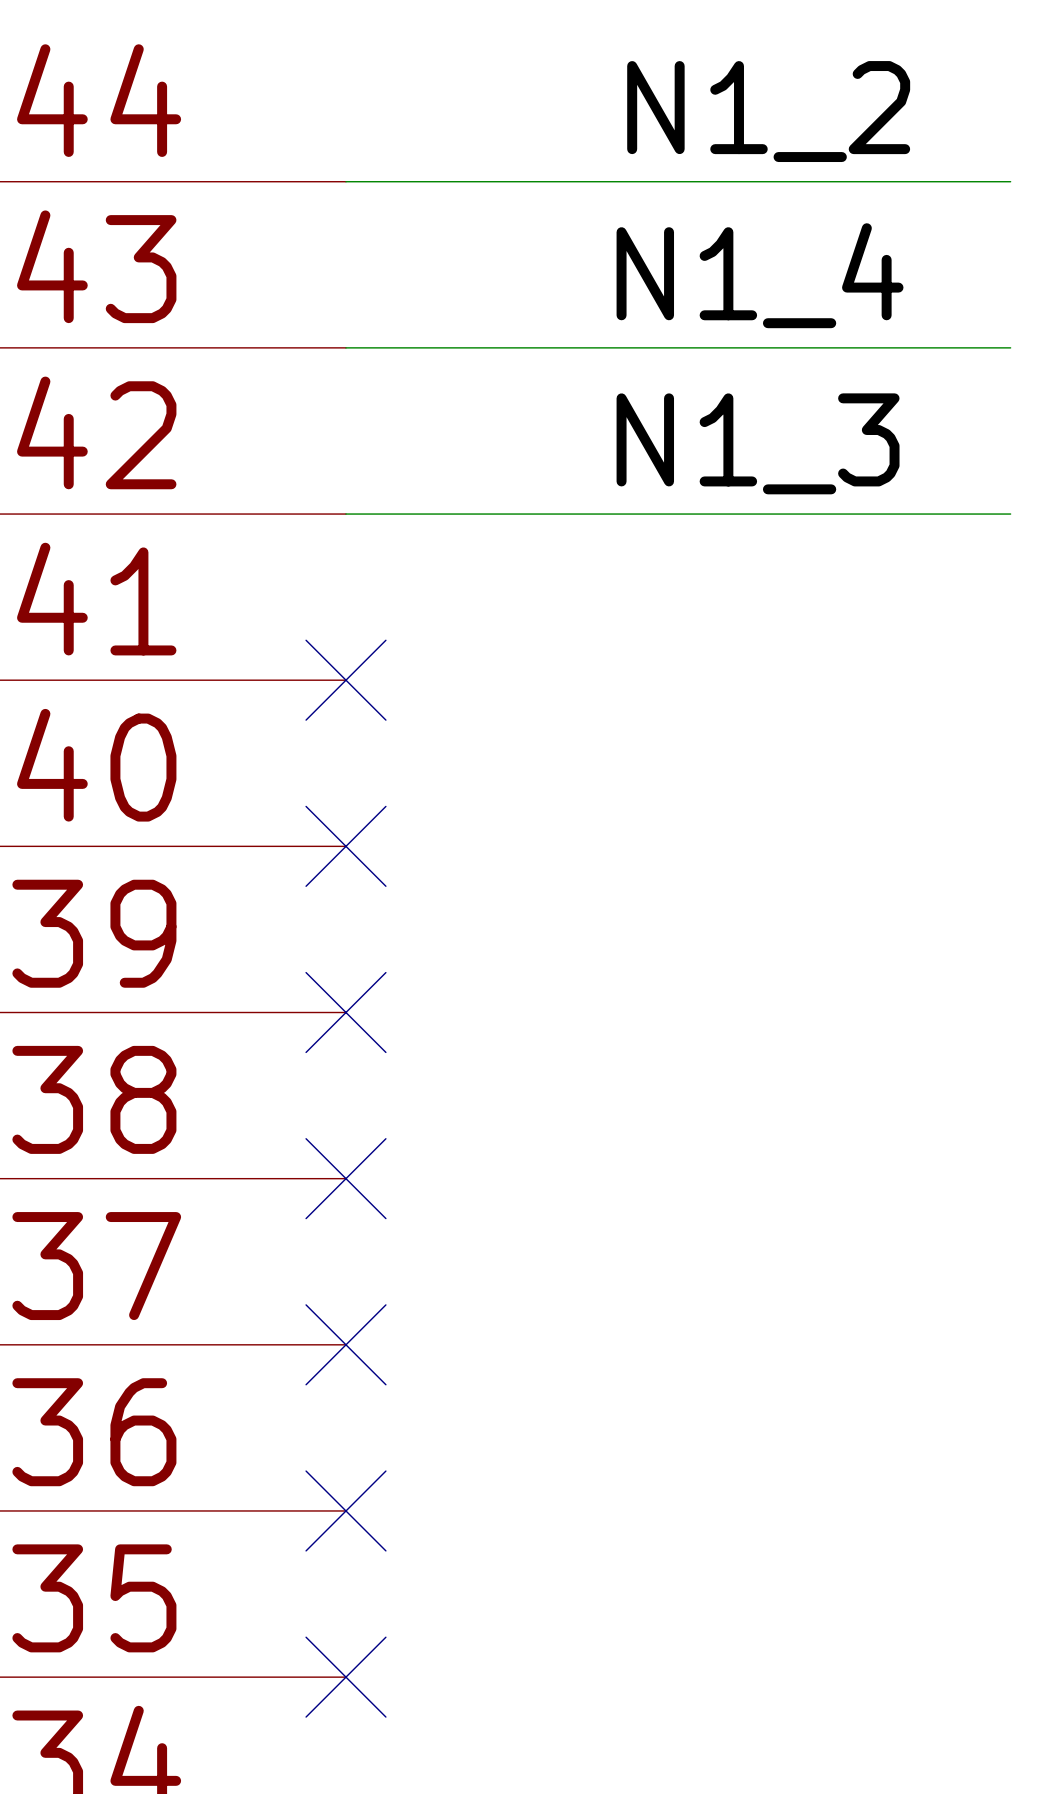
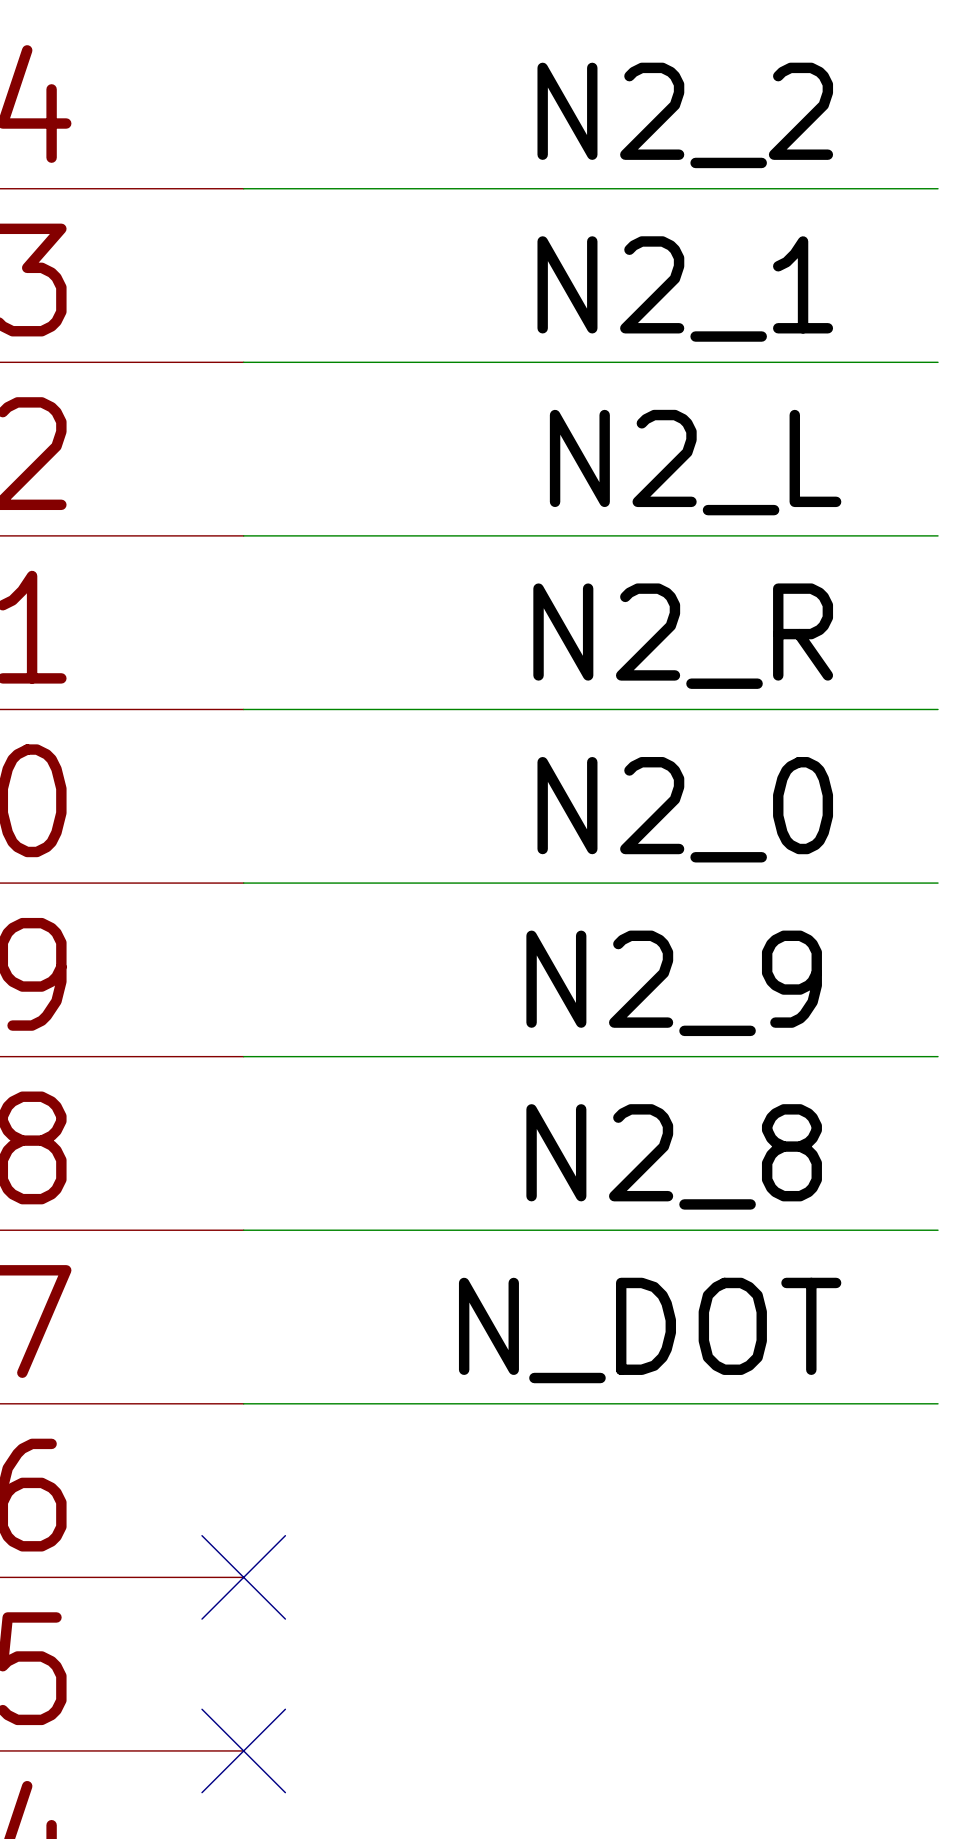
label: N1_2 (768, 111) -> N2_2 (685, 115)
label: N1_4 (760, 275) -> none
label: none -> N2_1 (685, 289)
label: N1_3 (758, 443) -> none
label: none -> N2_L (695, 462)
label: none -> N2_R (683, 636)
wire: none -> (243, 709) (938, 709)
no-connect mark: (345, 680) -> none
label: none -> N2_0 (685, 809)
wire: none -> (243, 883) (938, 883)
no-connect mark: (345, 846) -> none
label: none -> N2_9 (674, 983)
wire: none -> (243, 1056) (938, 1056)
no-connect mark: (345, 1012) -> none
label: none -> N2_8 (674, 1156)
wire: none -> (243, 1230) (938, 1230)
no-connect mark: (345, 1178) -> none
label: none -> N_DOT (650, 1330)
wire: none -> (243, 1403) (938, 1403)
no-connect mark: (345, 1344) -> none

